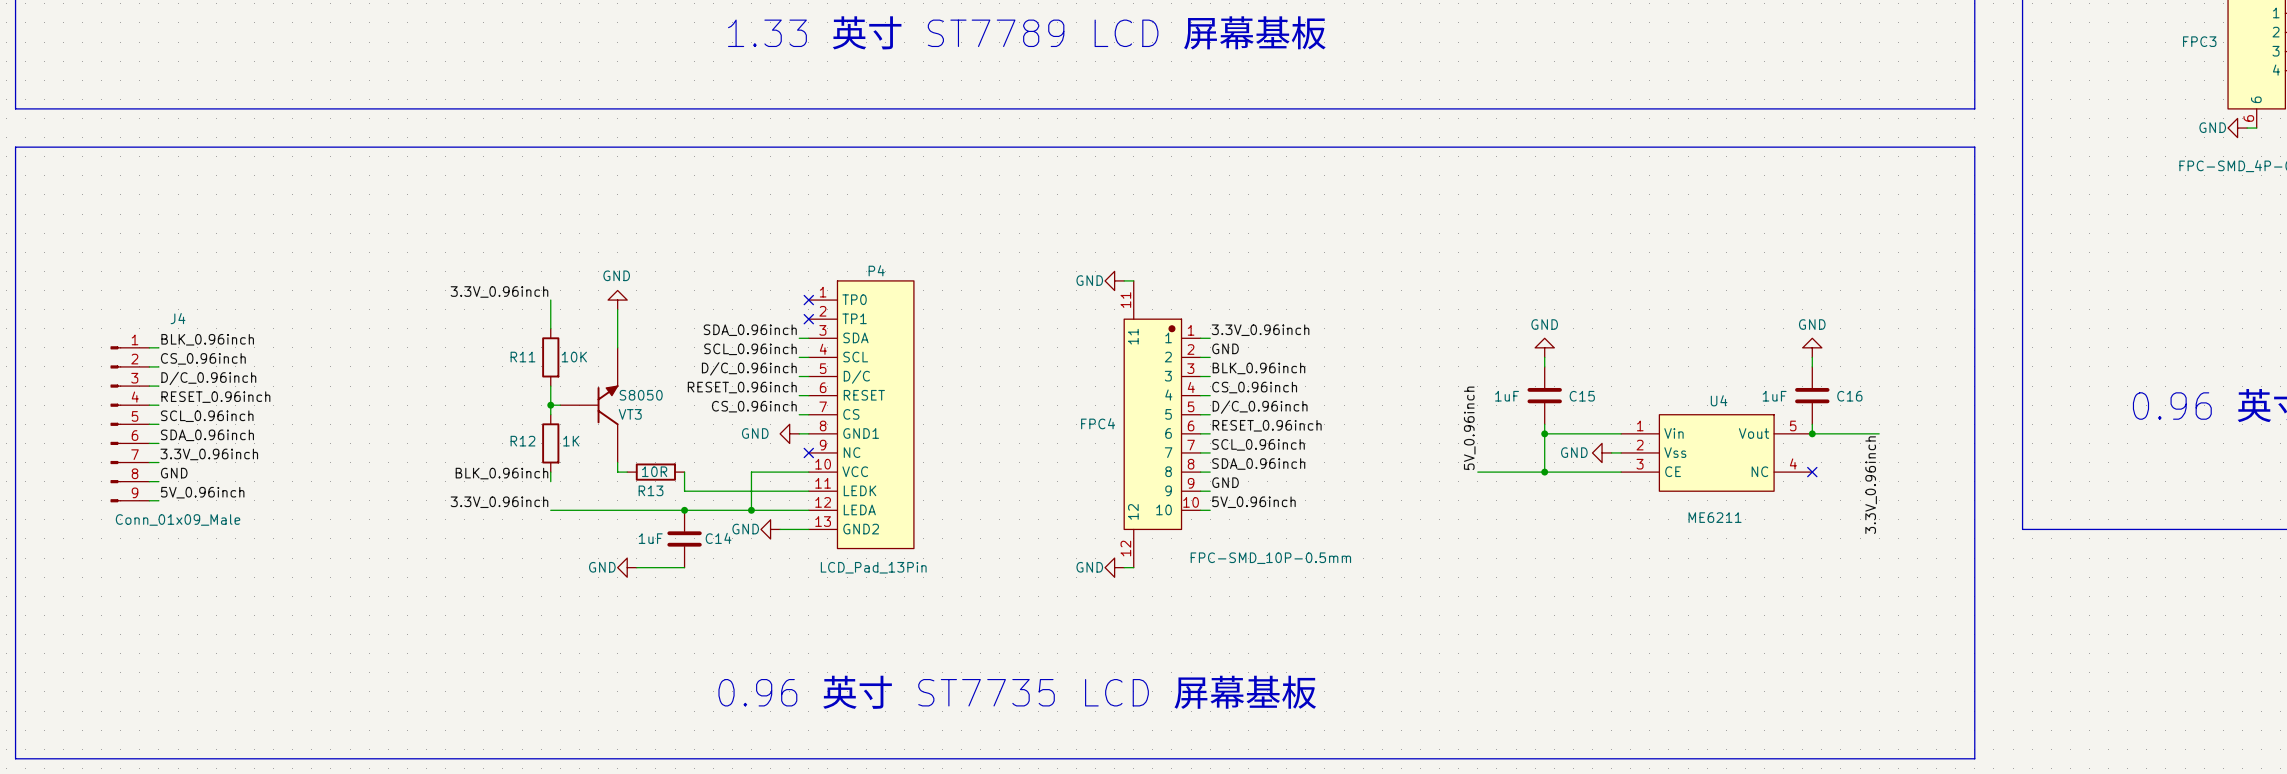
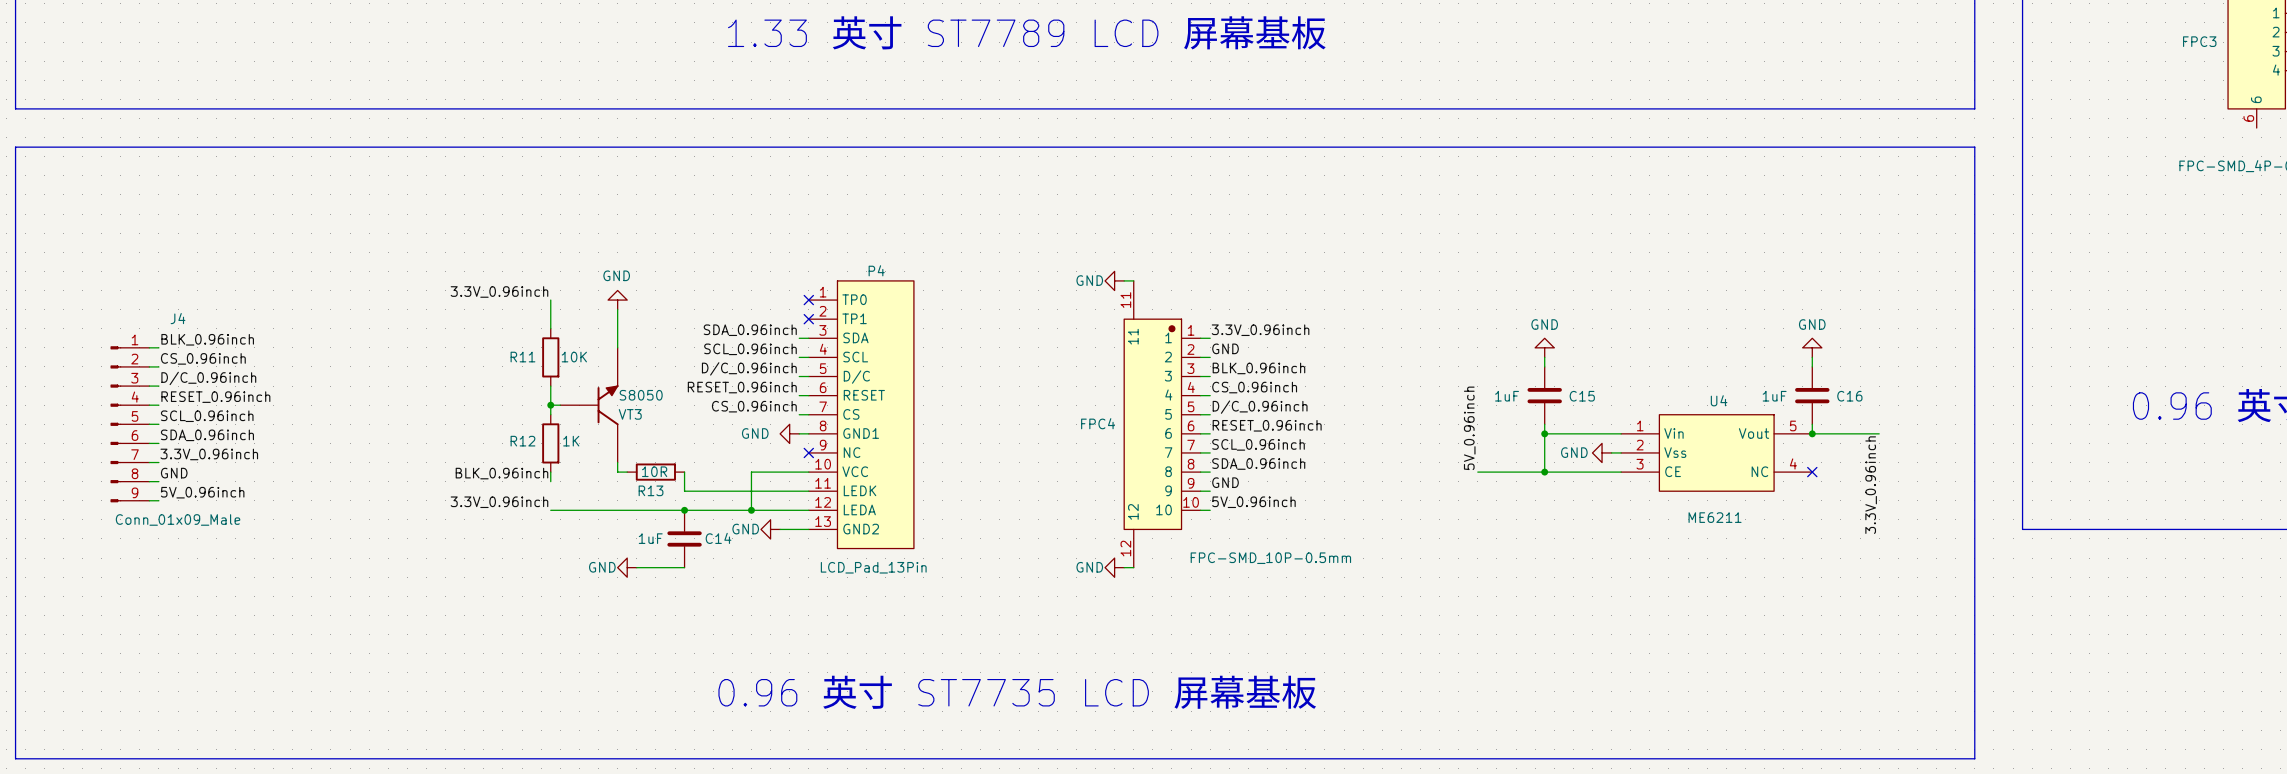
power symbol: GND (2237, 128) -> none
wire: (2247, 128) (2256, 128) -> none

